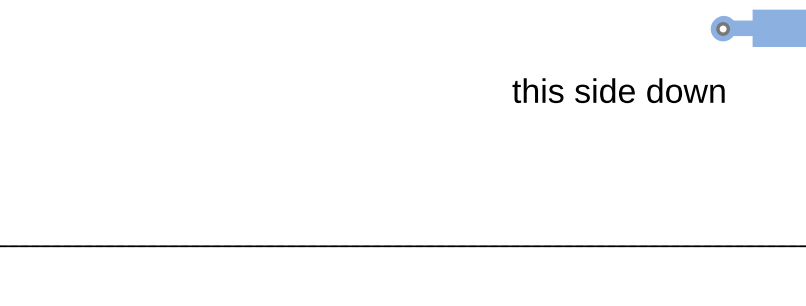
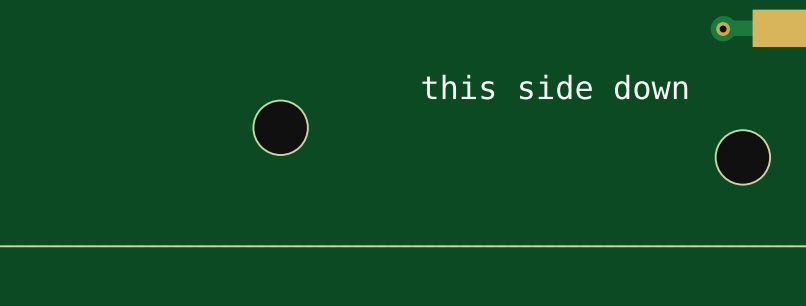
text position: this side down (618, 90) -> this side down (554, 87)
part: none -> (280, 127)
part: none -> (742, 157)

